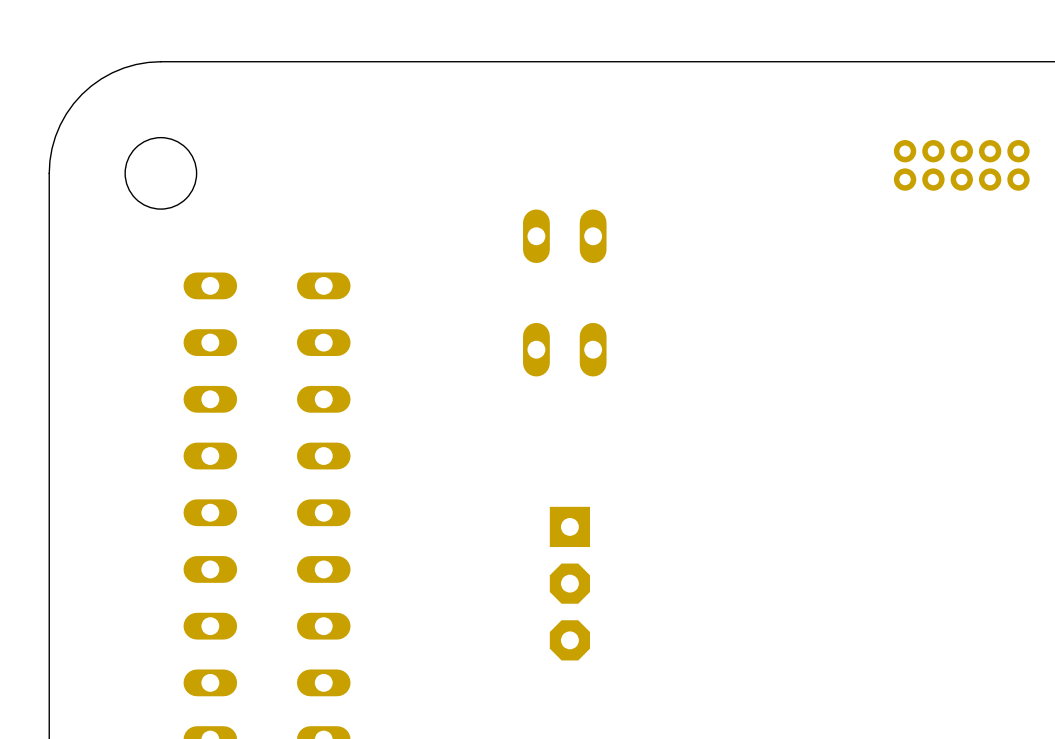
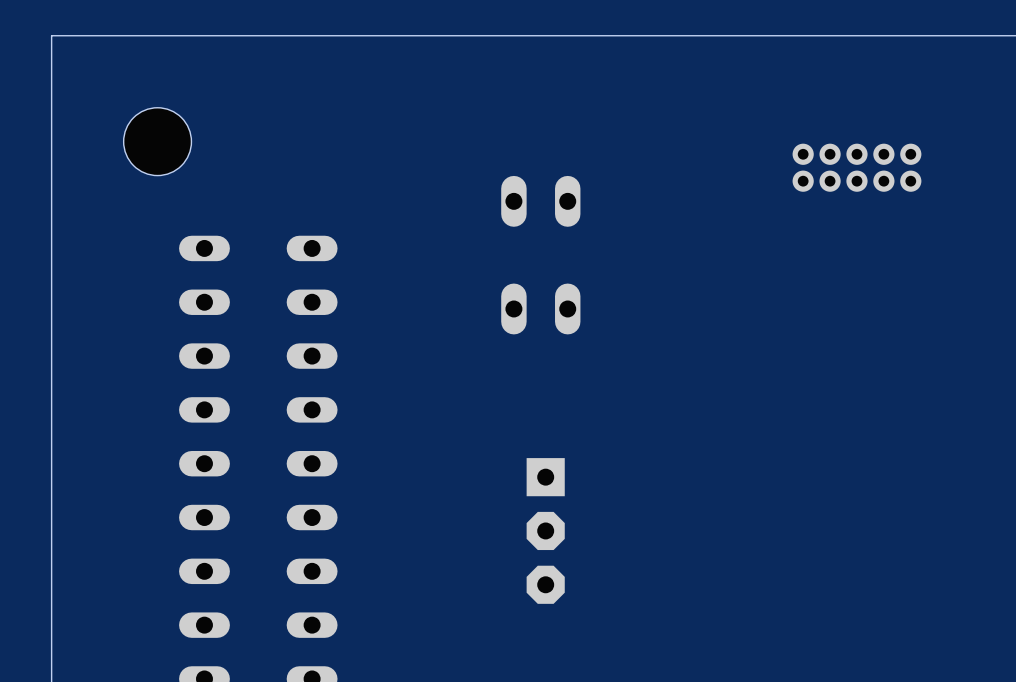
board edge: (160, 61) (124, 67) (101, 78) (81, 94) (66, 113) (55, 136) (49, 173) -> (157, 35) (51, 35) (51, 141)
part position: (961, 165) -> (856, 167)

